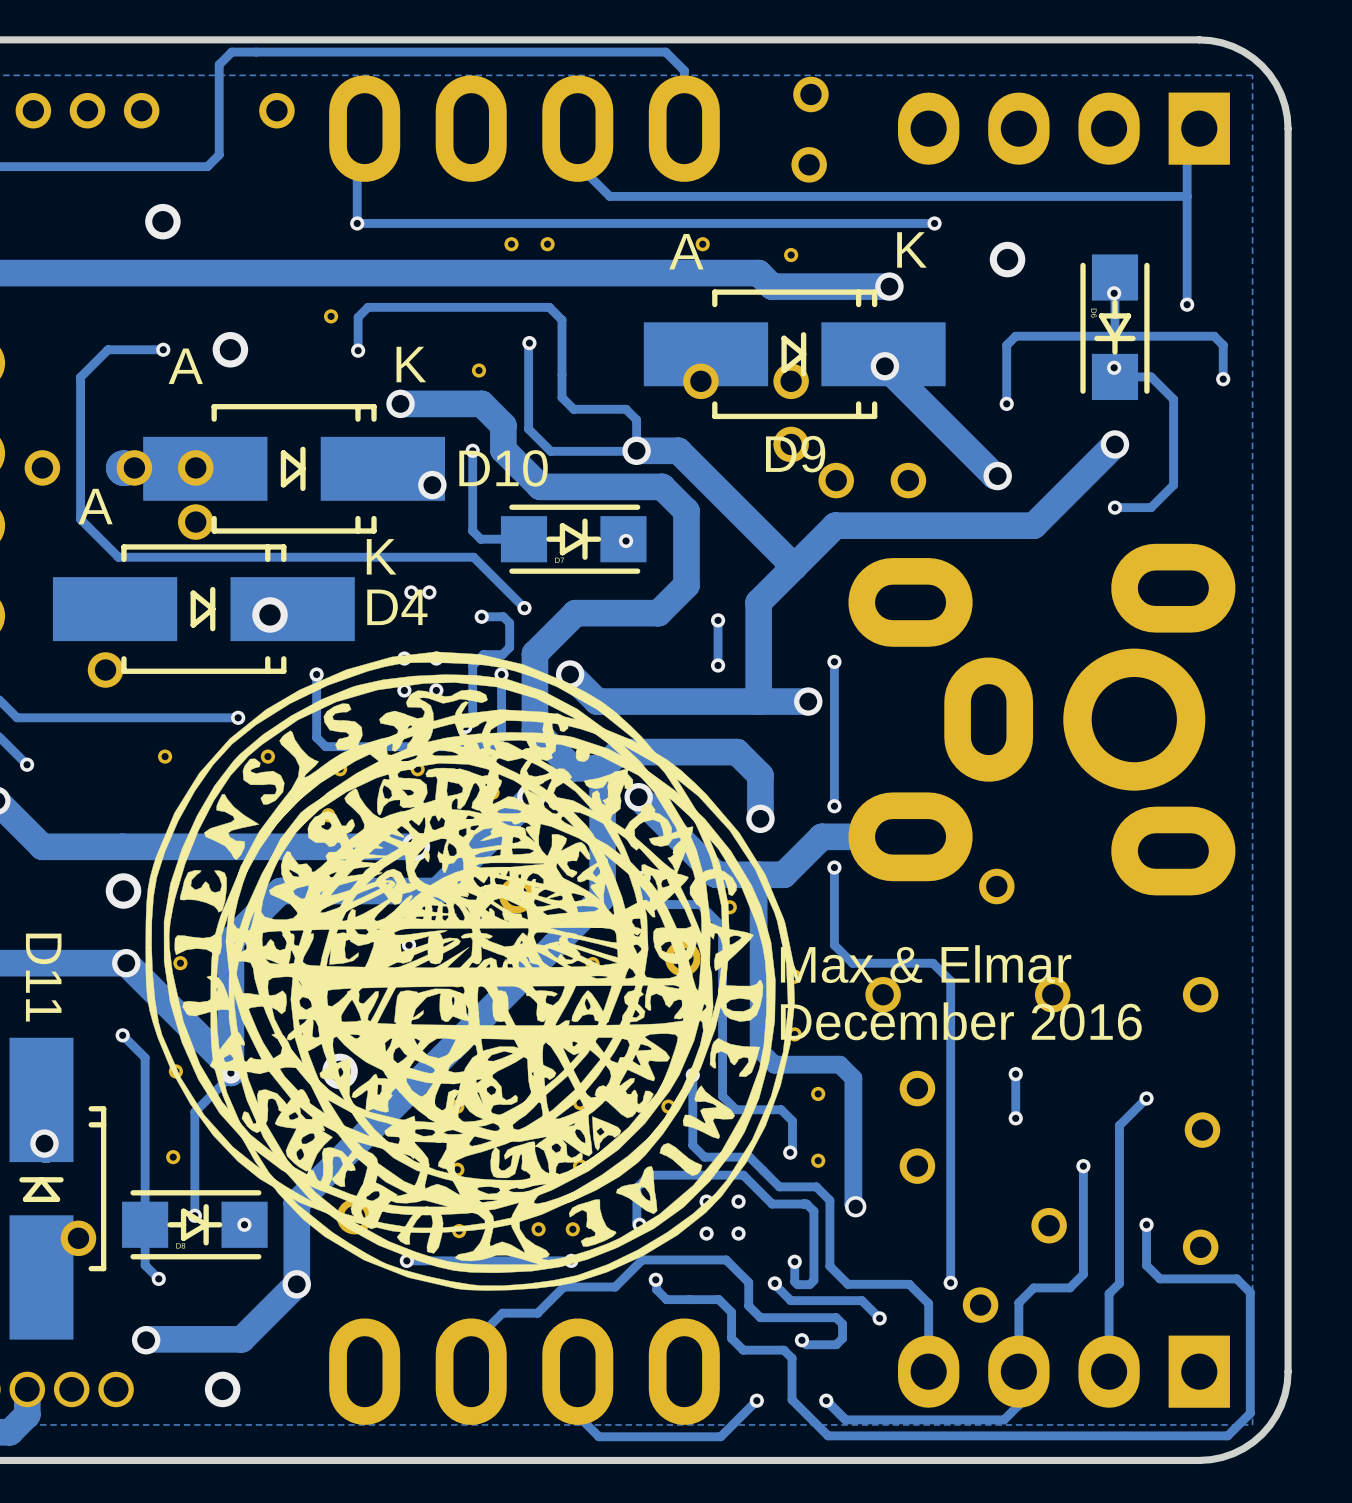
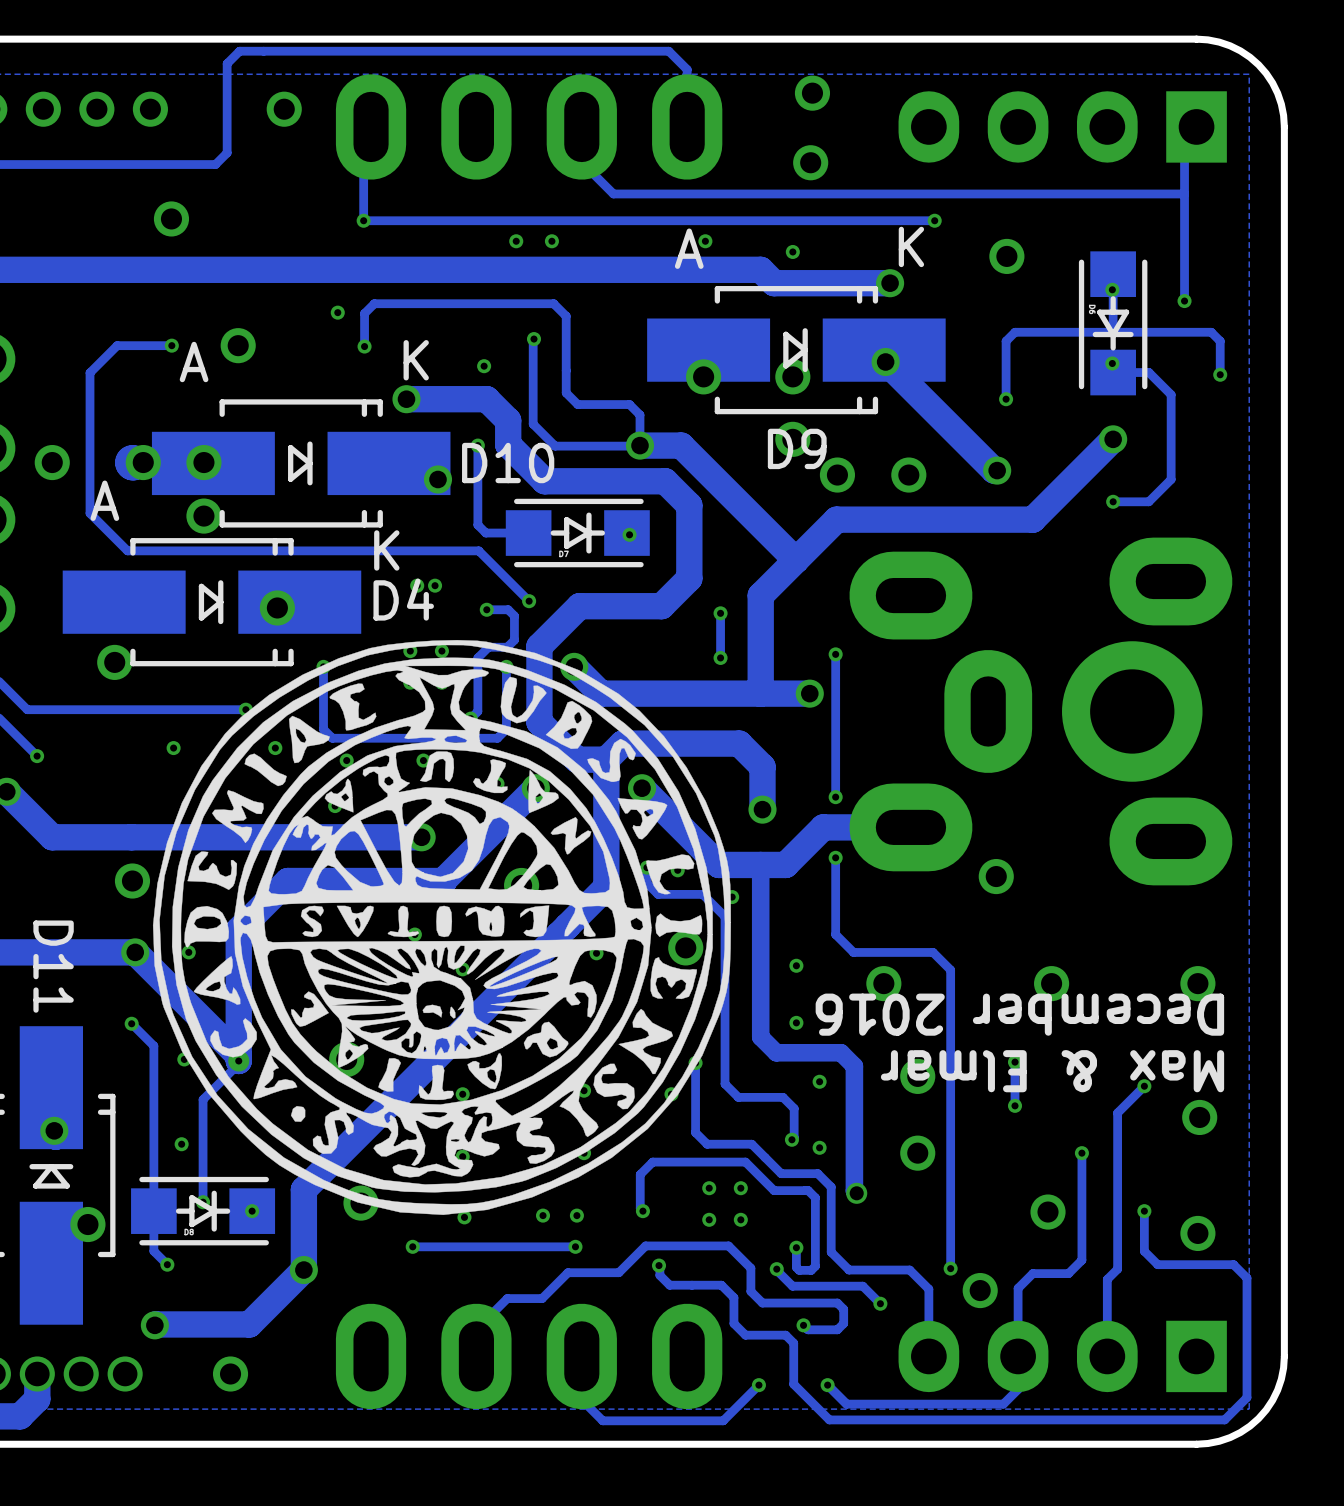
drawing shape: [145, 651, 730, 1234] -> [152, 639, 731, 1215]
drawing: [210, 709, 795, 1291] -> none
text rotation: 0° (926, 964) -> 180° (1052, 1071)
text rotation: 0° (961, 1021) -> 180° (1019, 1014)

